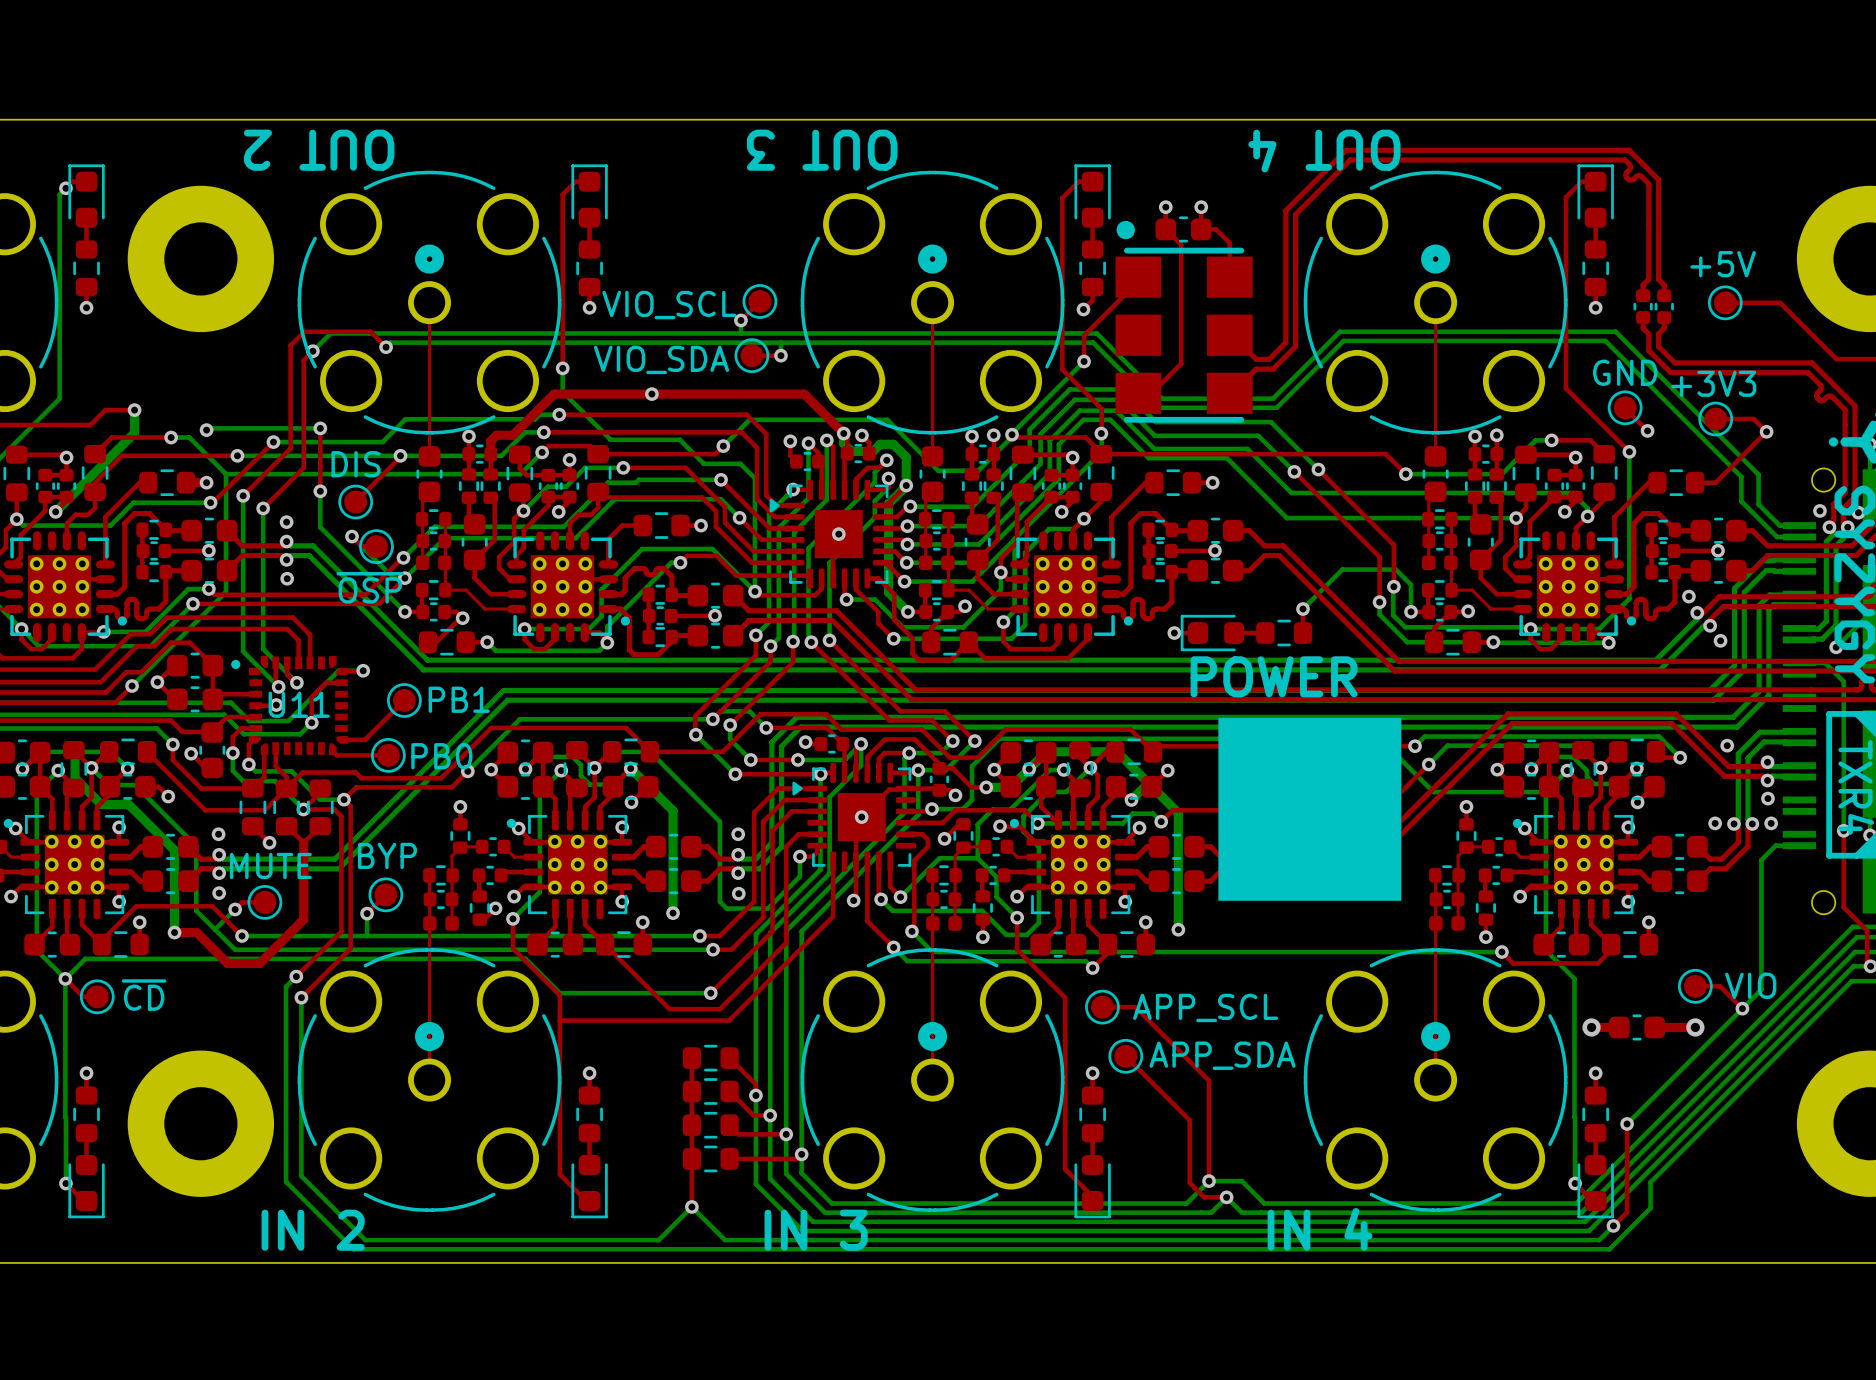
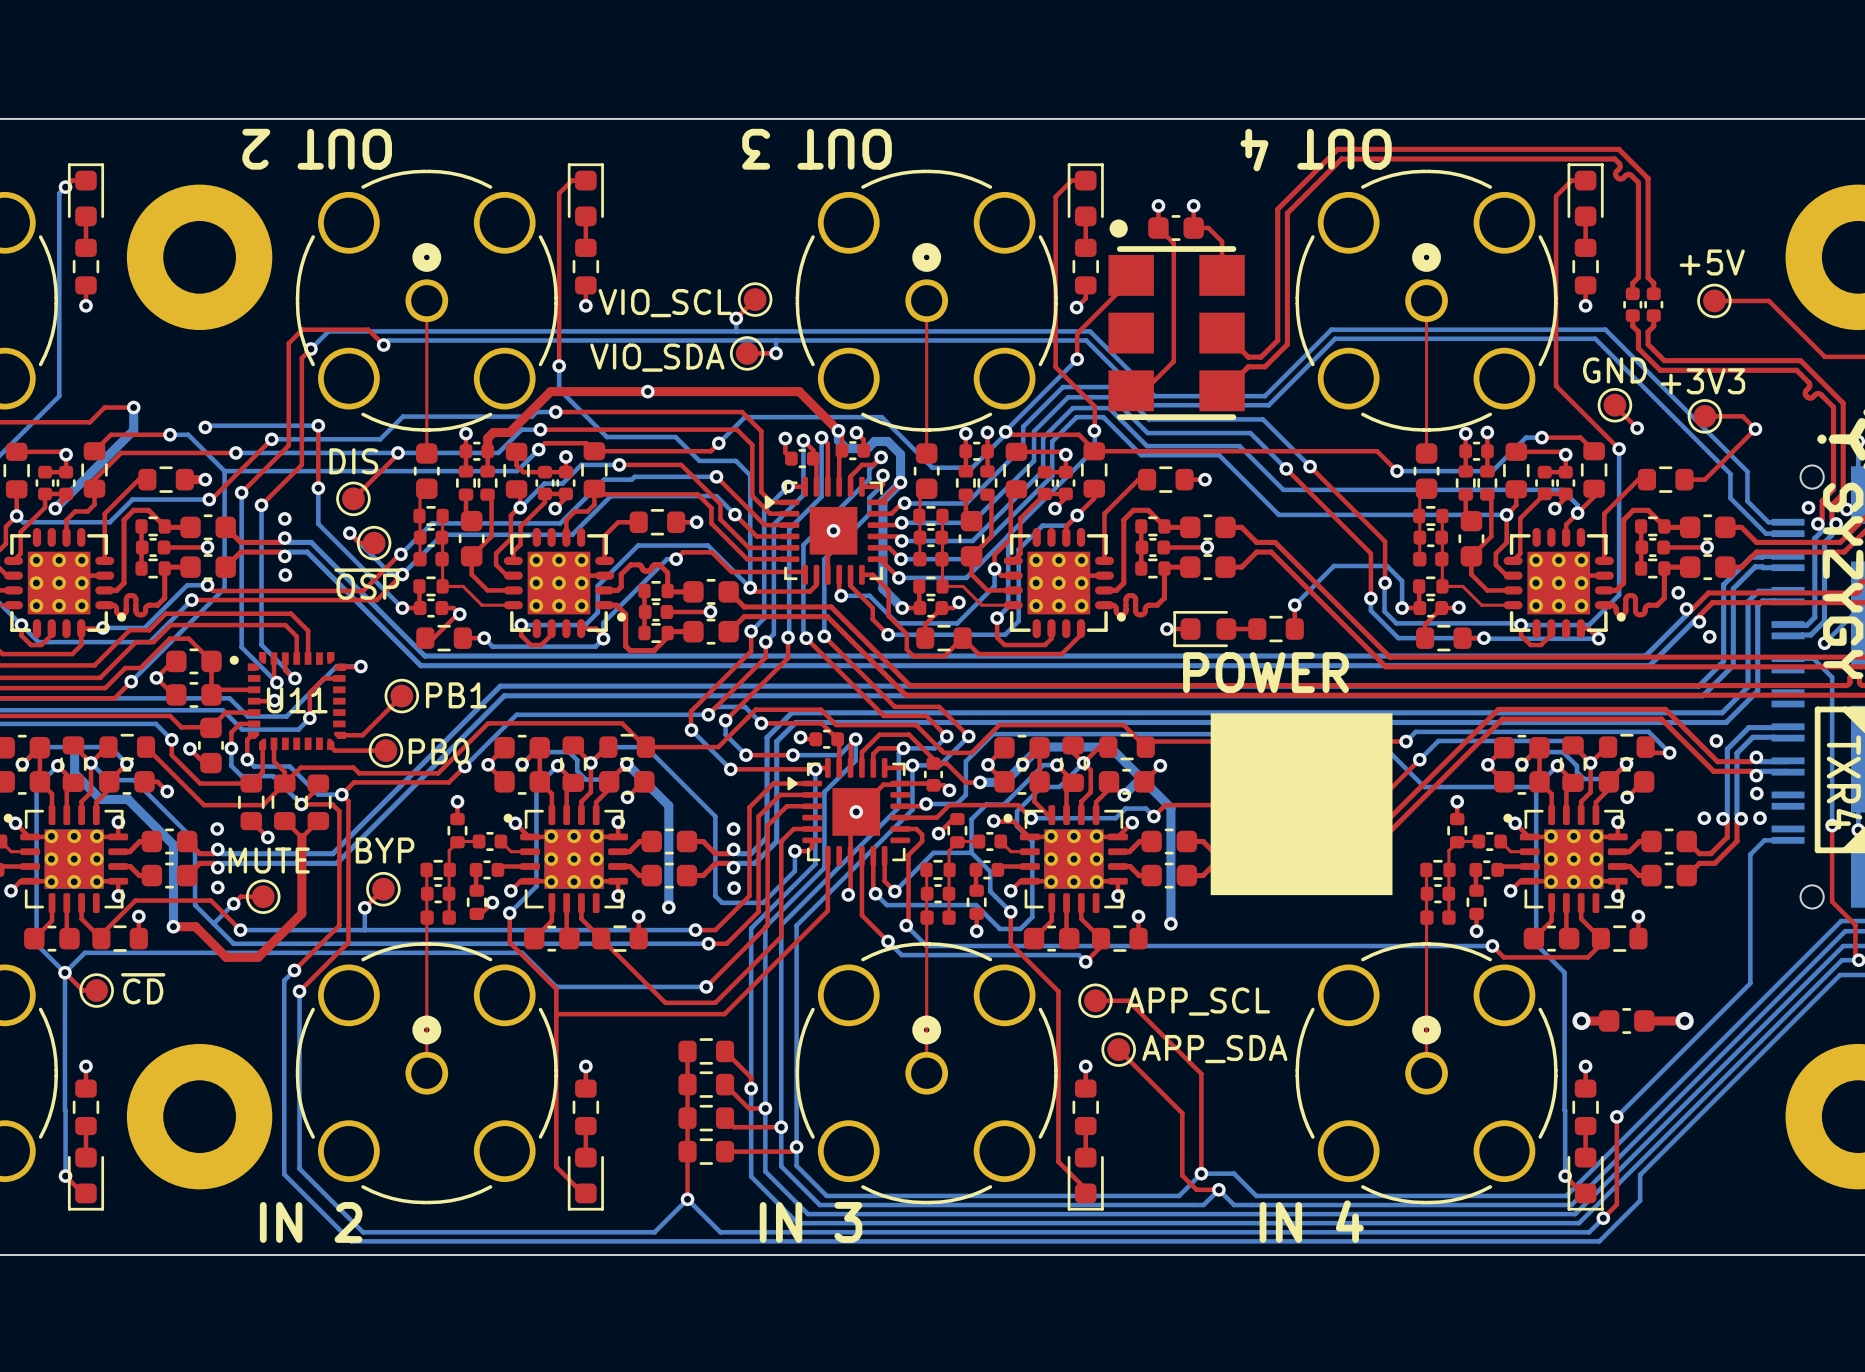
text: VIO (1750, 985) -> none
top track: (1695, 986) (1720, 986) (1742, 1008) -> none
part: (1695, 986) -> none
via: (1742, 1008) -> none

